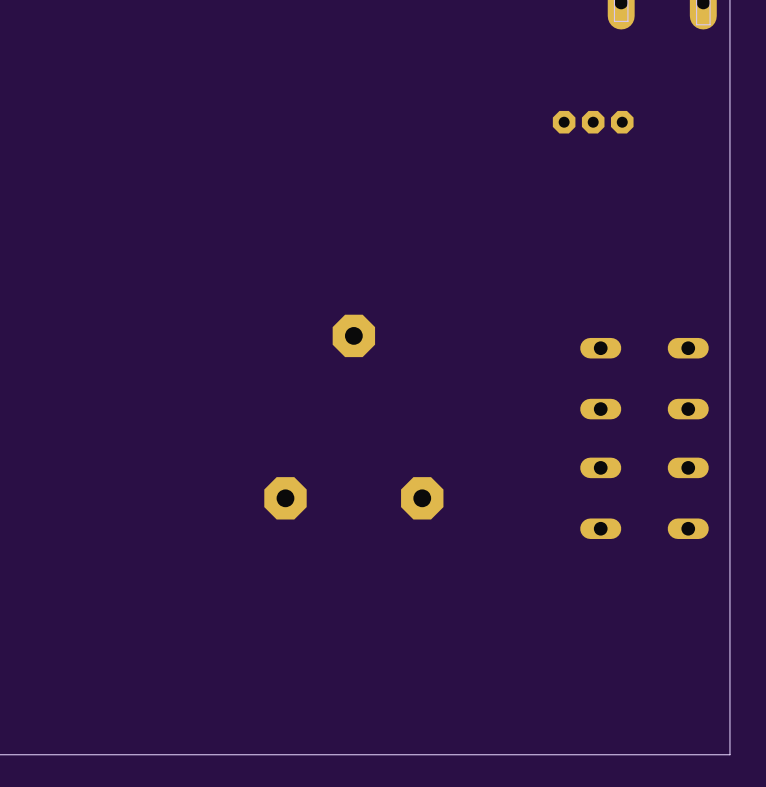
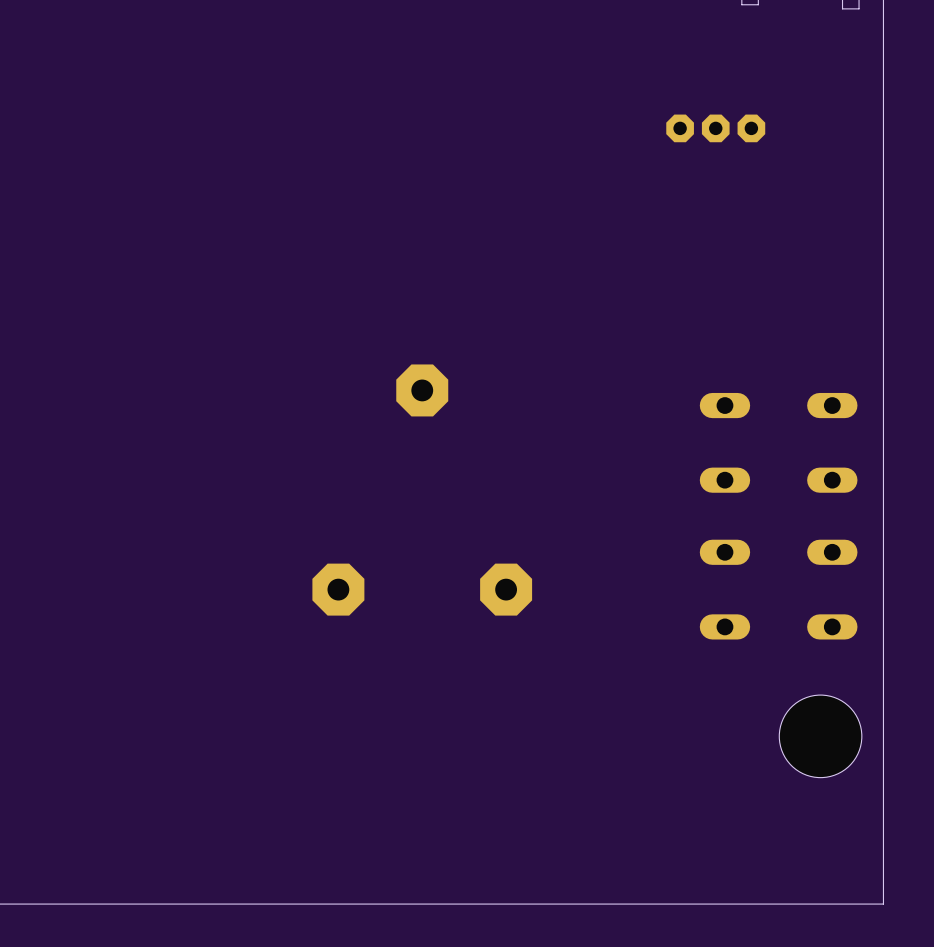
hole: none -> (820, 736)

